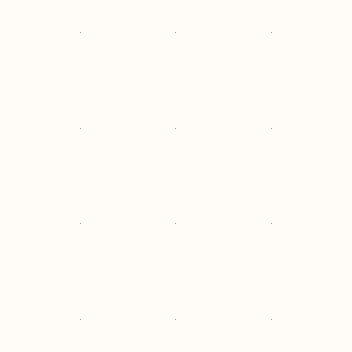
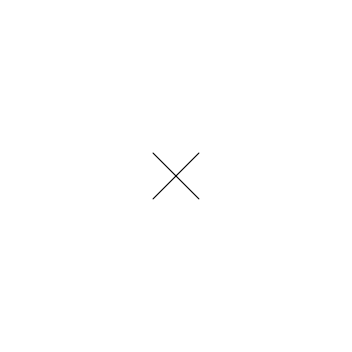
no-connect mark: none -> (175, 175)

